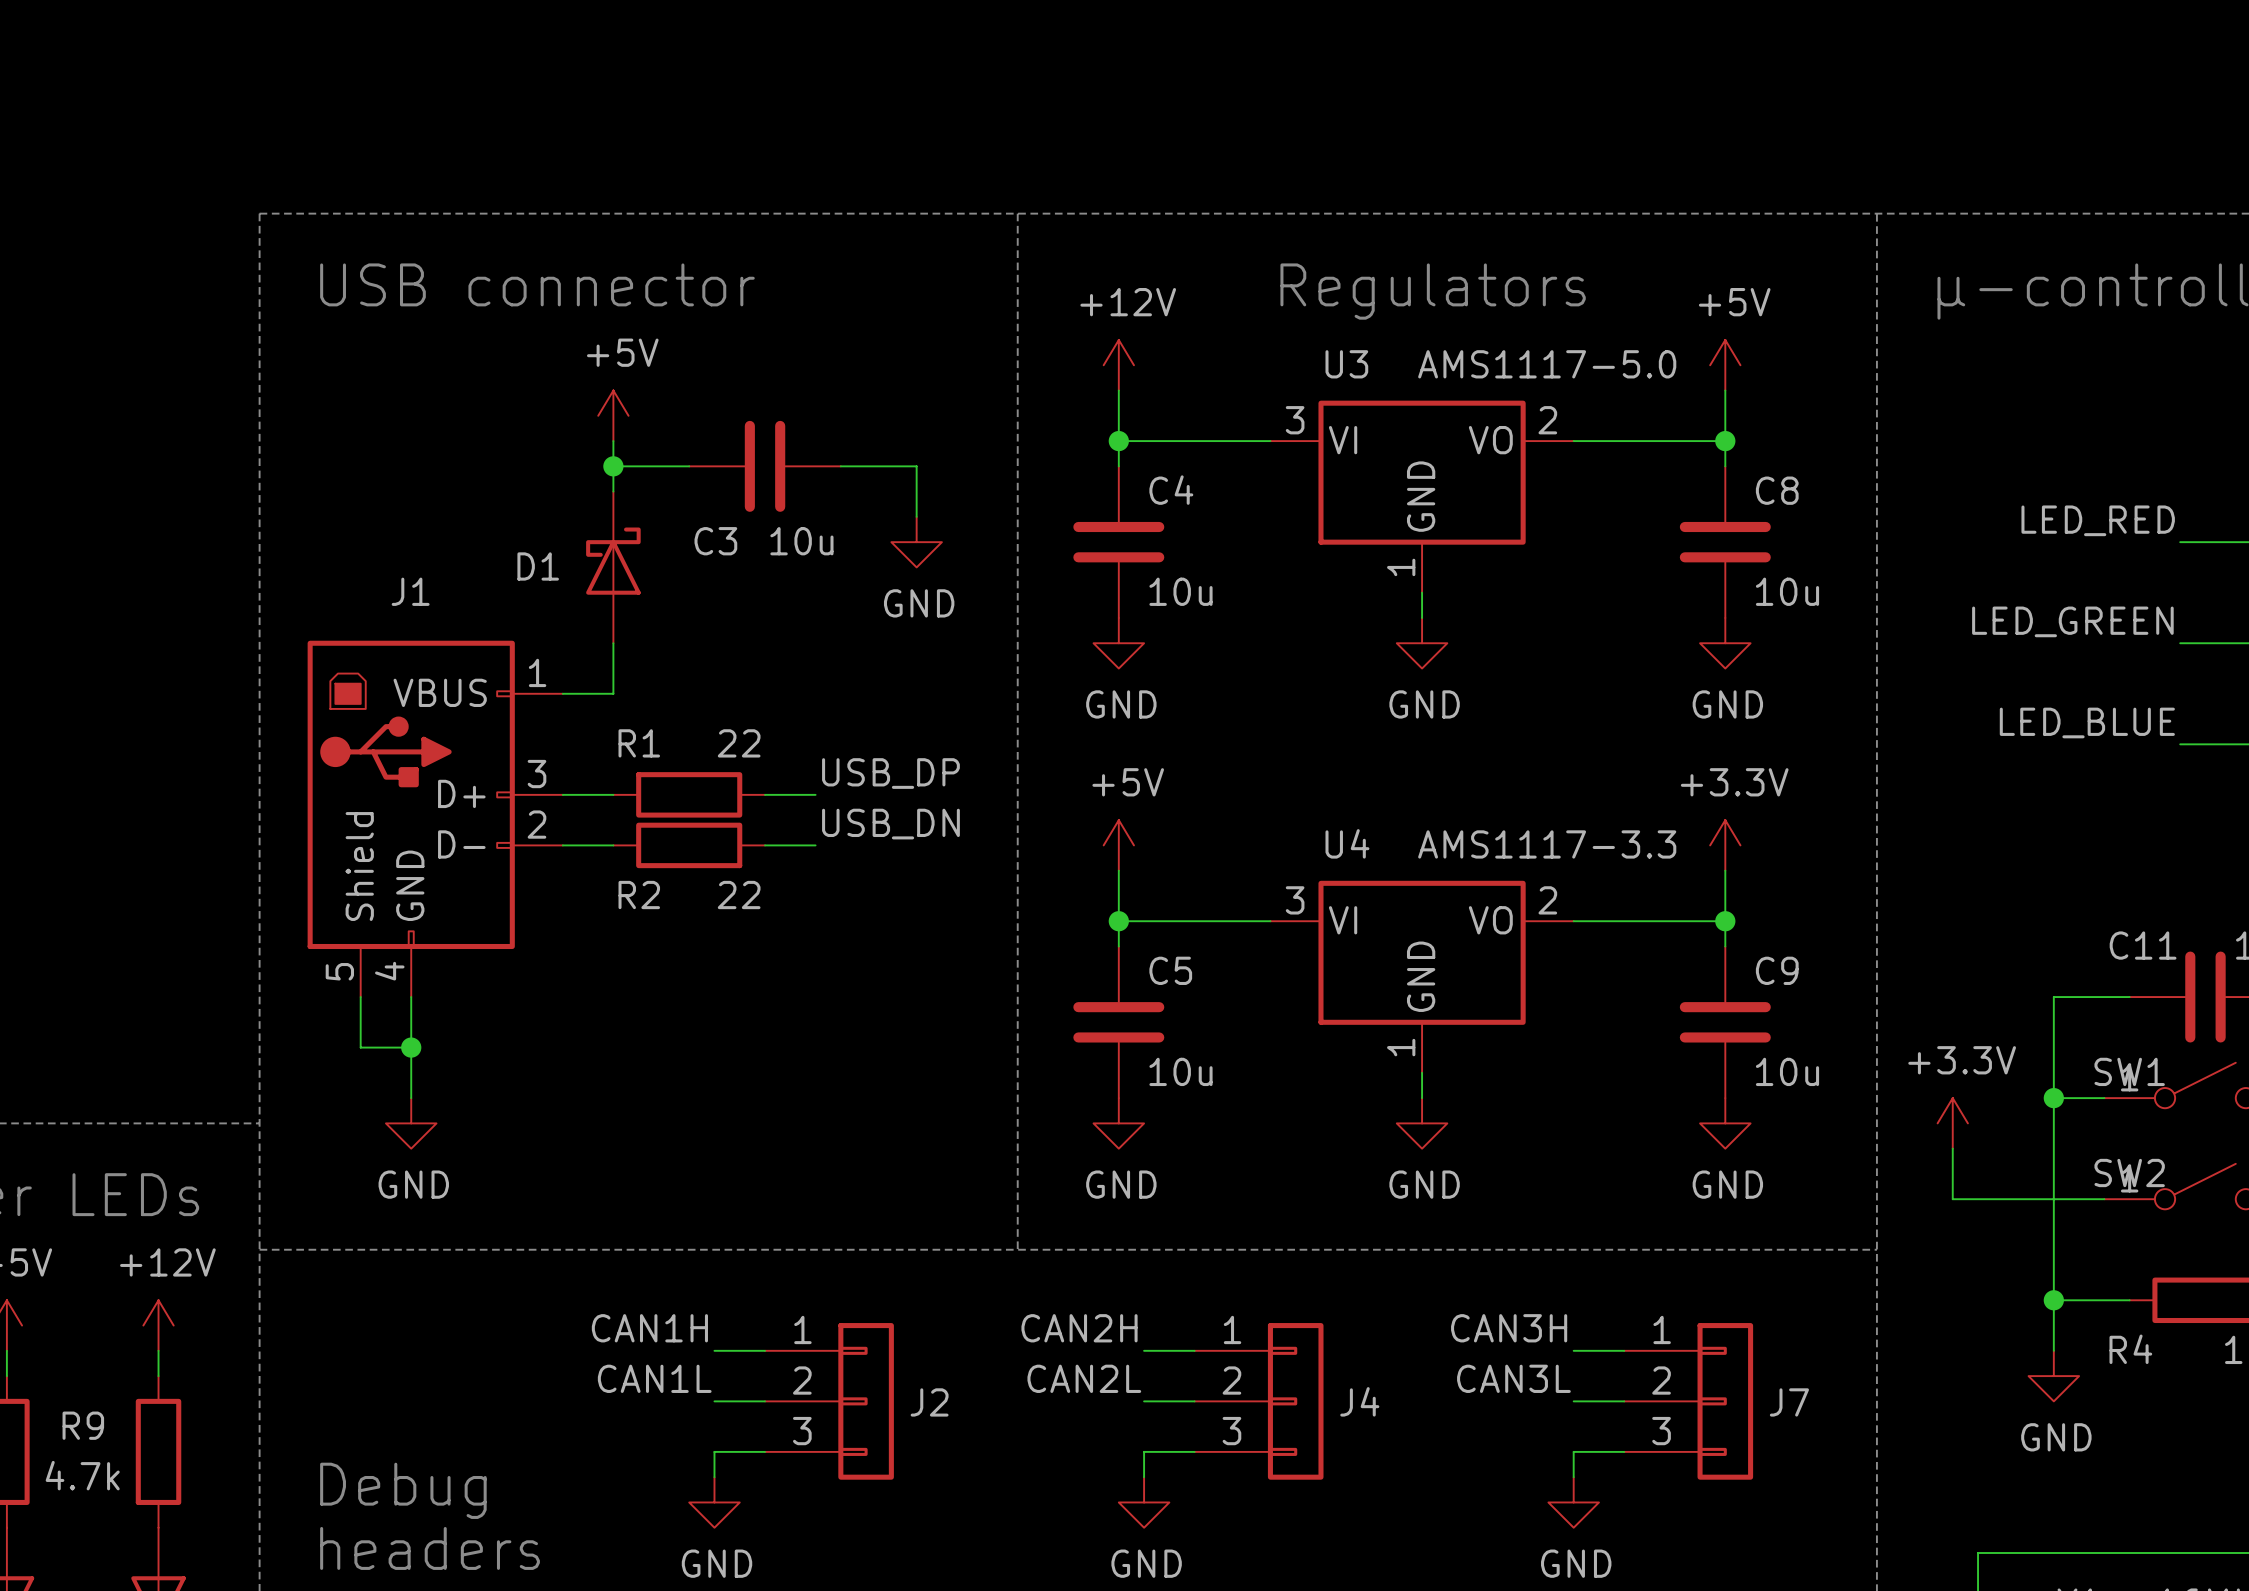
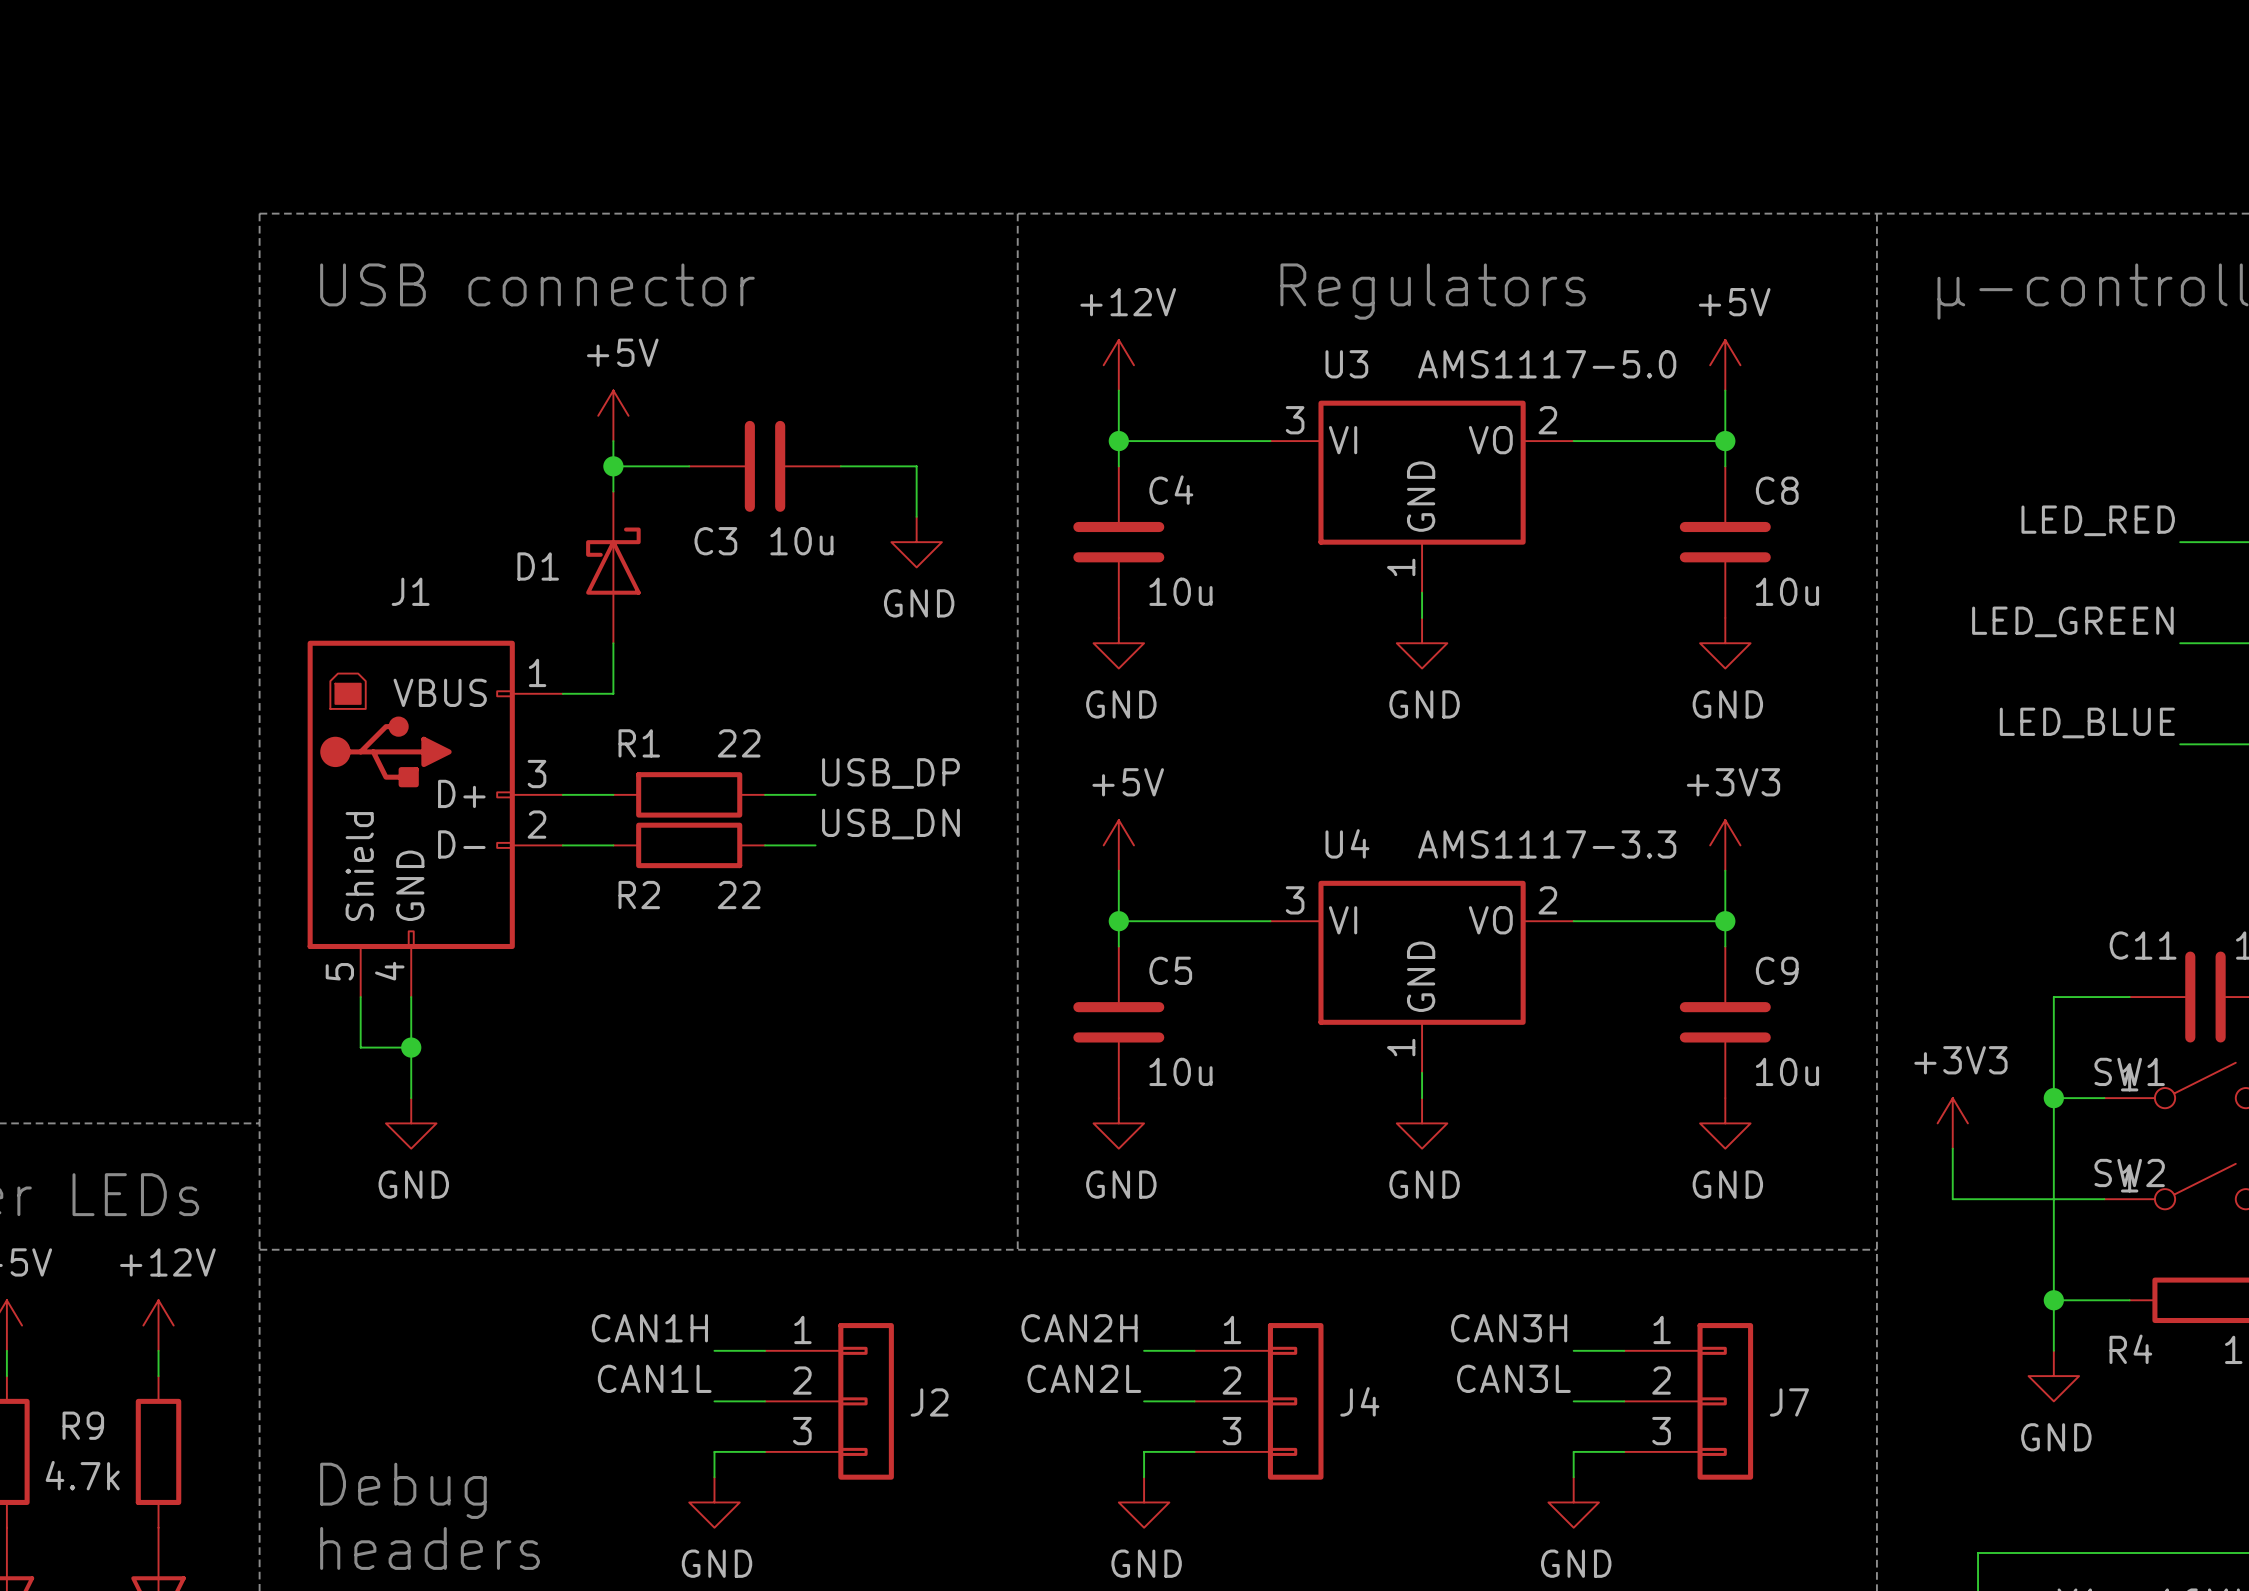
power symbol: +3.3V (1725, 845) -> +3V3 (1725, 845)
power symbol: +3.3V (1952, 1123) -> +3V3 (1952, 1123)

